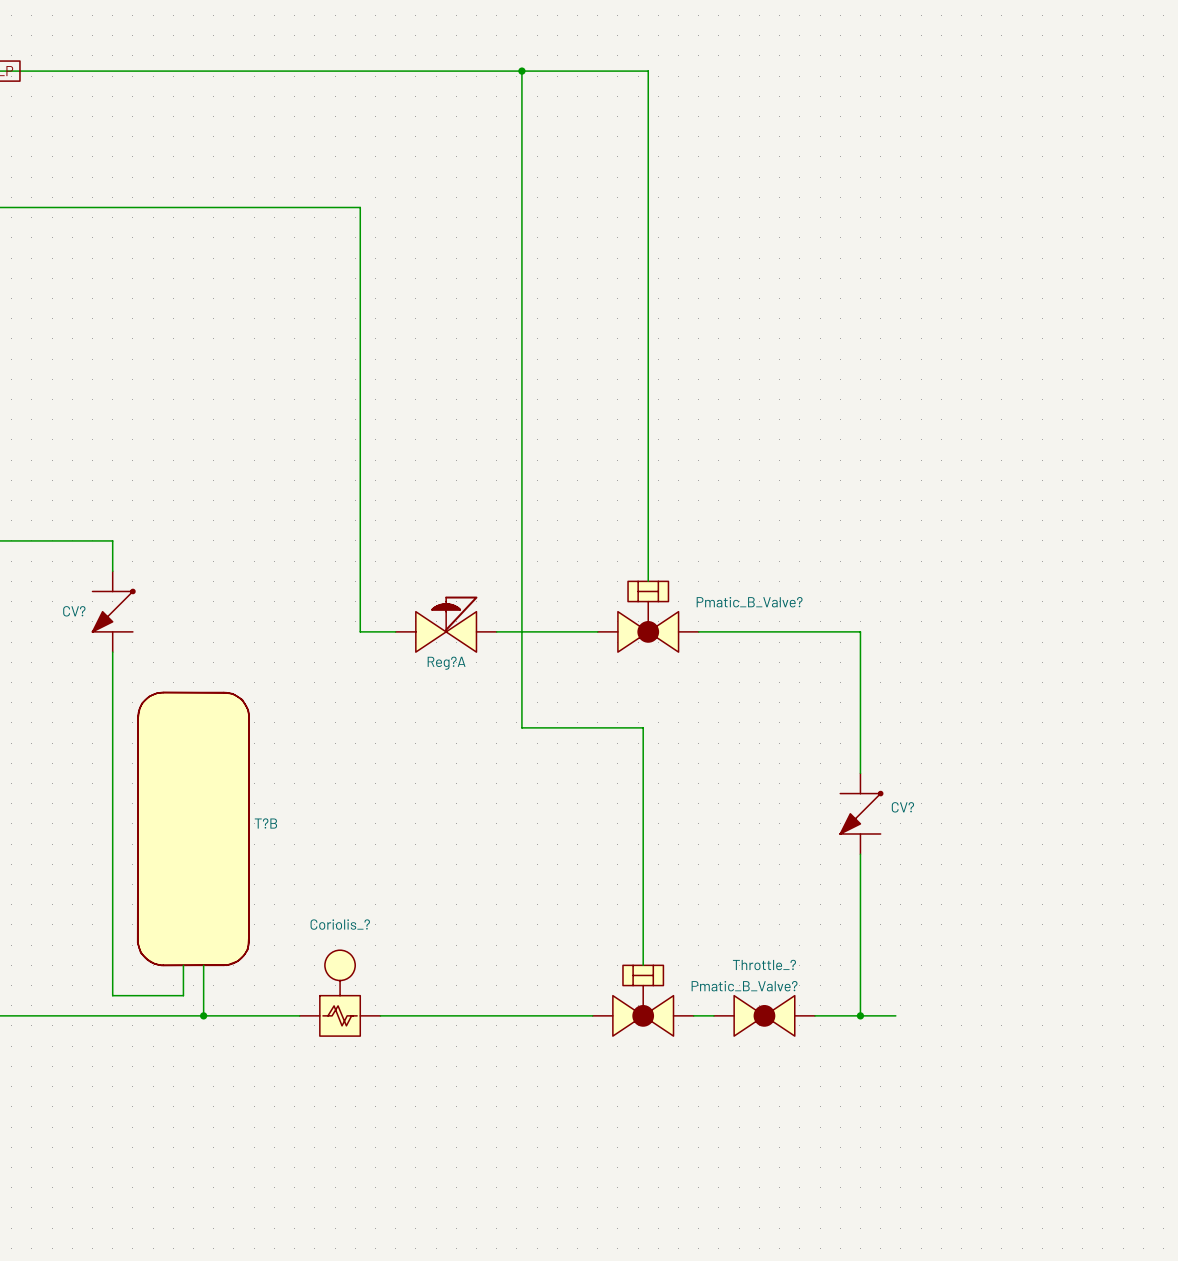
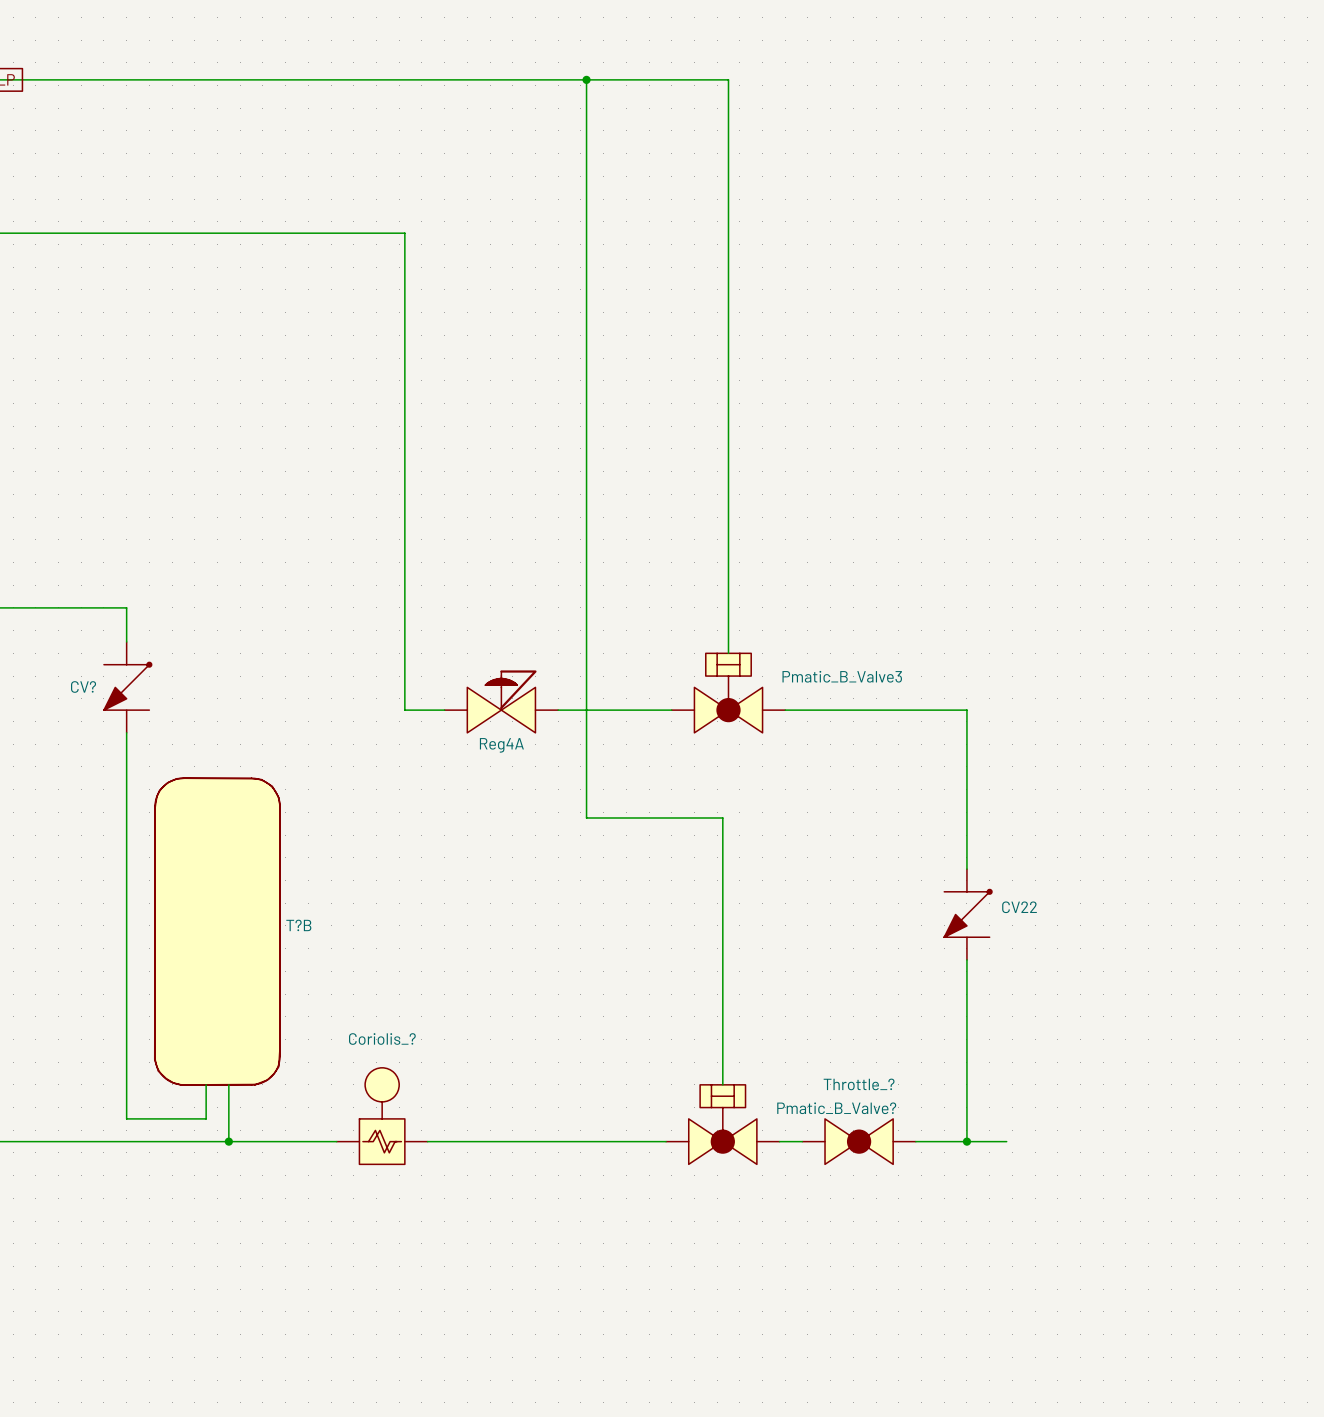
Pmatic_B_Valve? name: Pmatic_B_Valve? (749, 602) -> Pmatic_B_Valve3 (842, 676)
Reg?A name: Reg?A (446, 663) -> Reg4A (501, 745)
CV? name: CV? (902, 807) -> CV22 (1019, 907)

